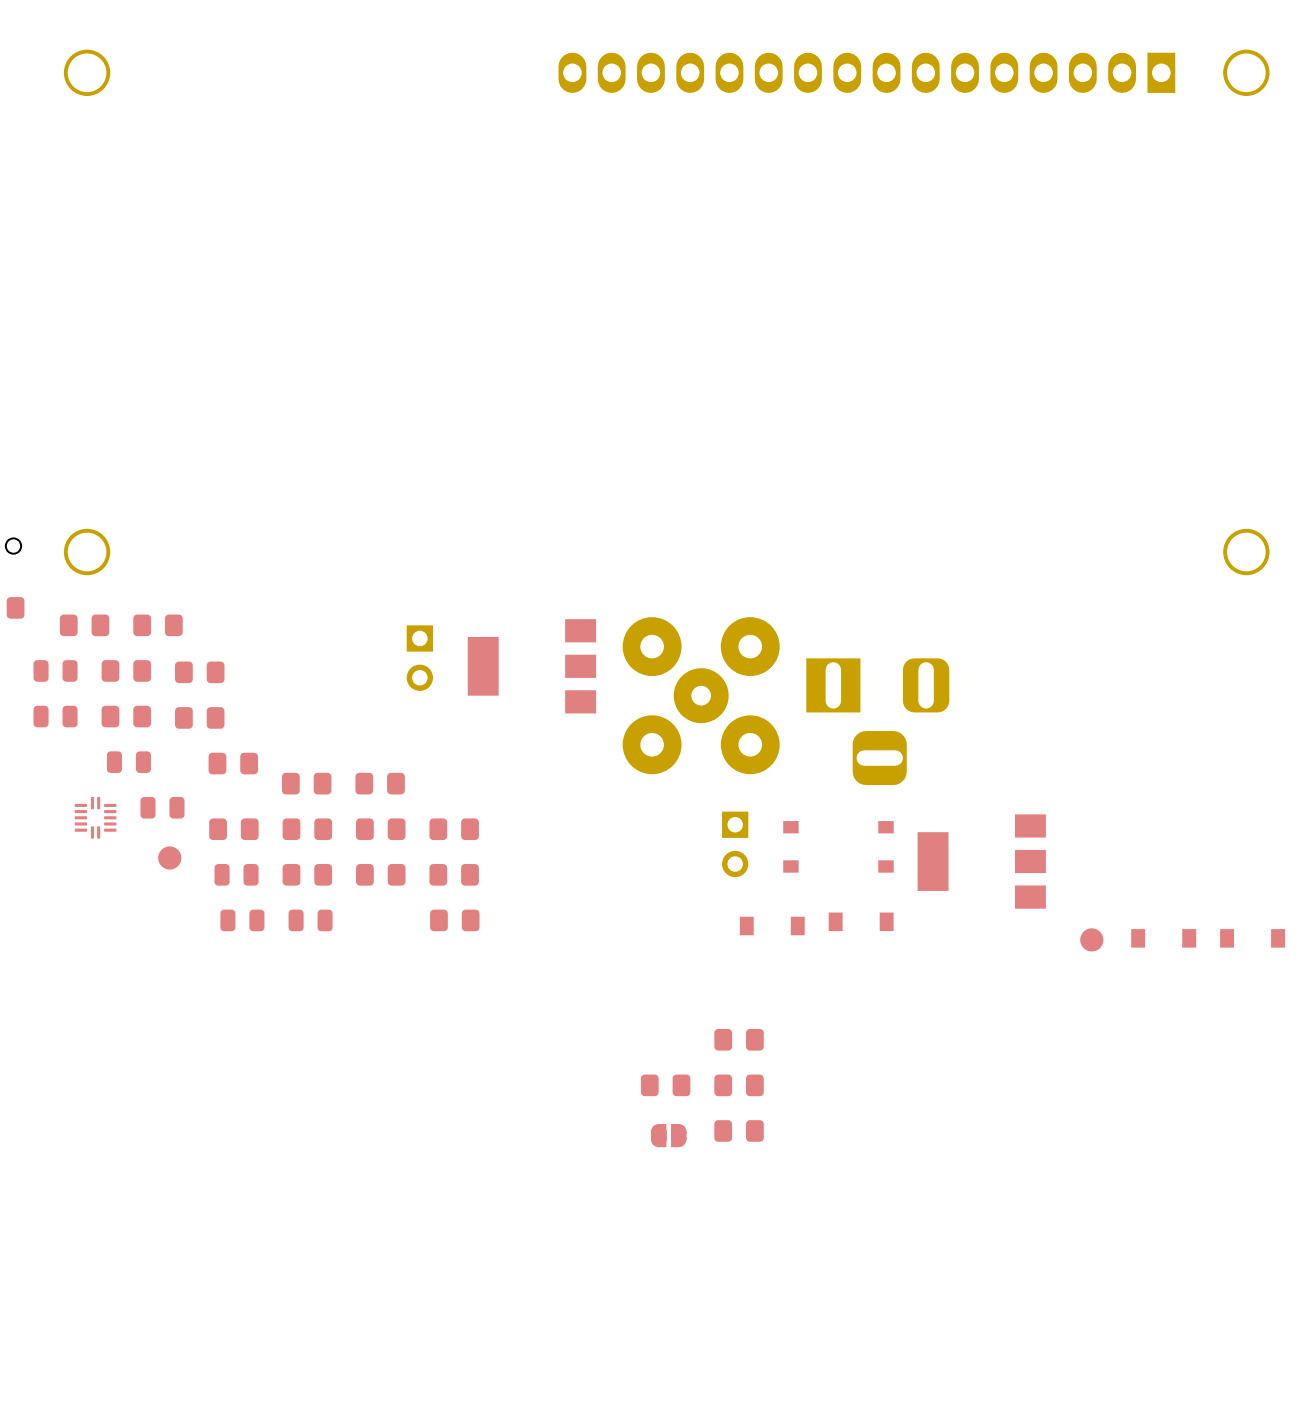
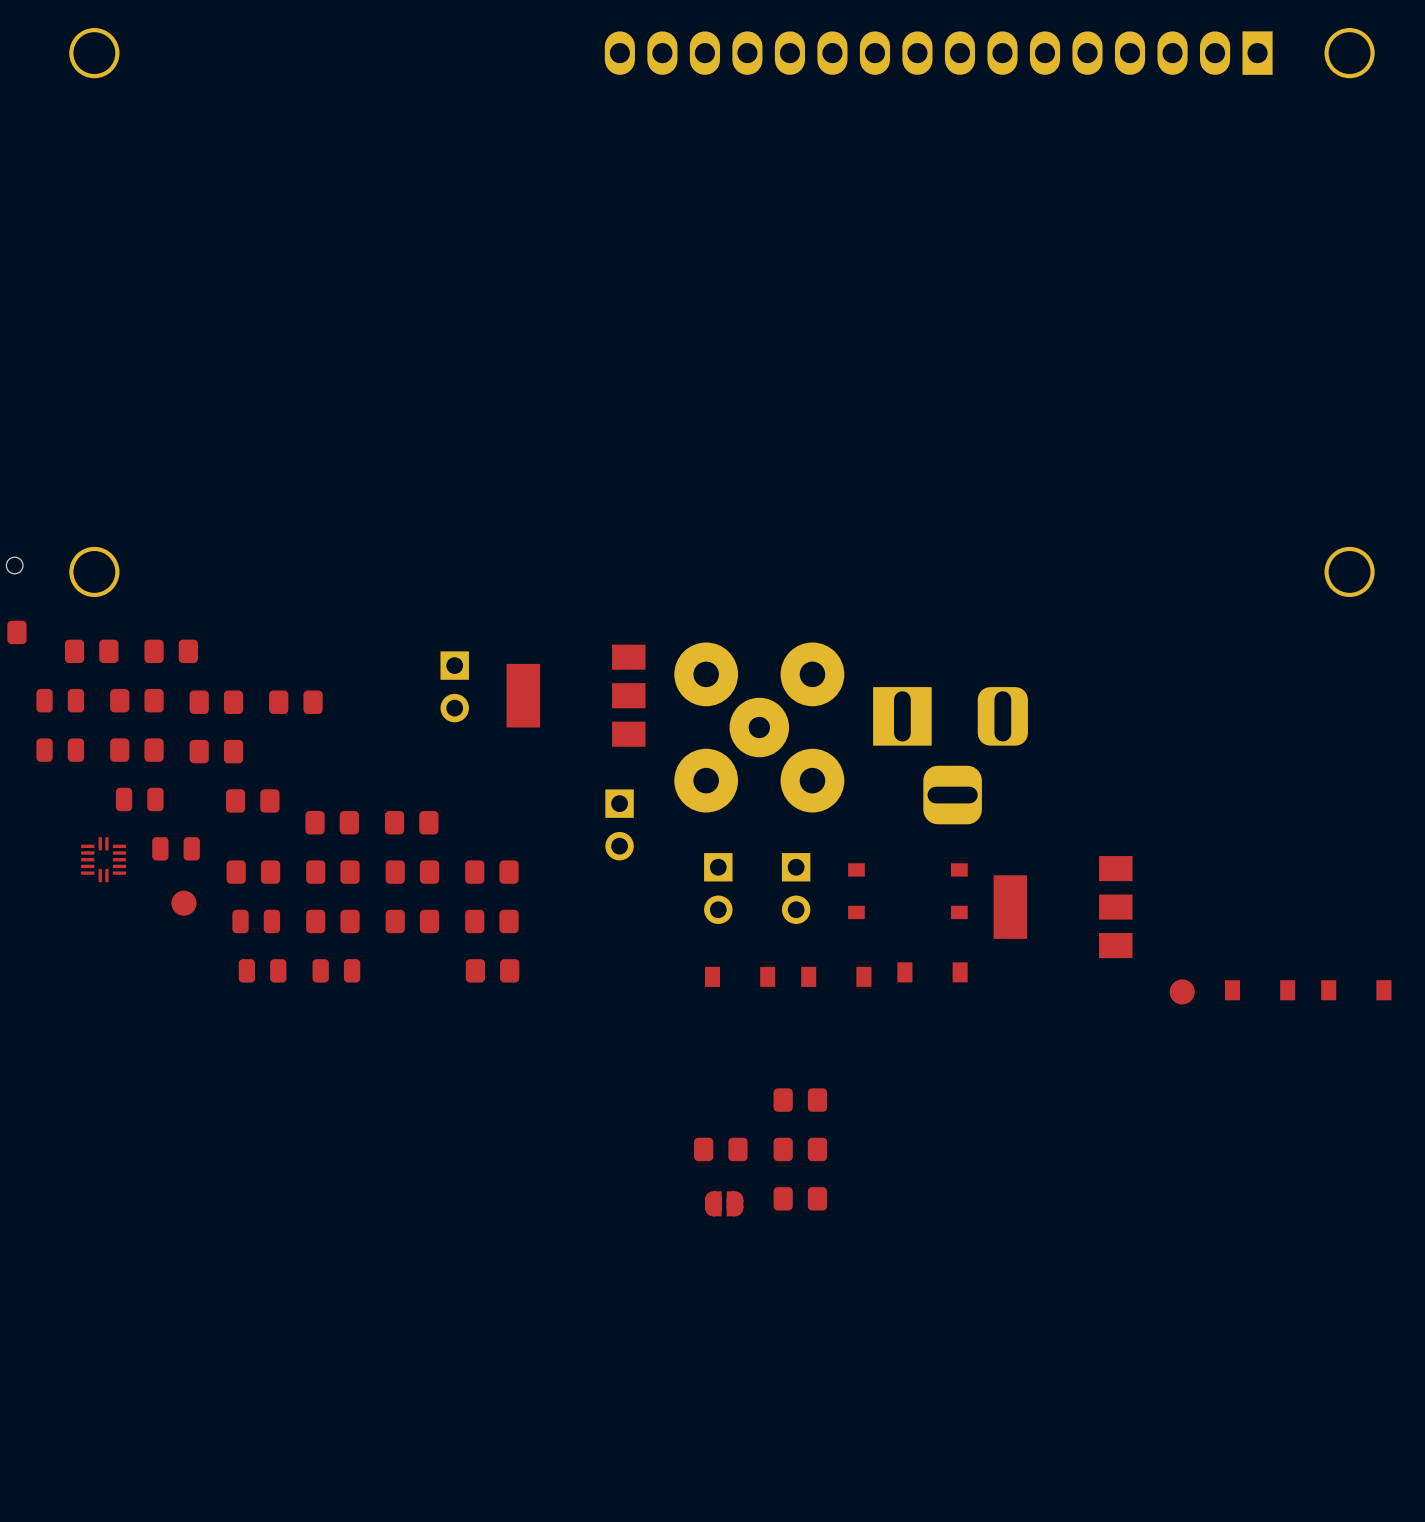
part: none -> (295, 702)
part: none -> (619, 824)
part: none -> (718, 888)
part: none -> (740, 976)

